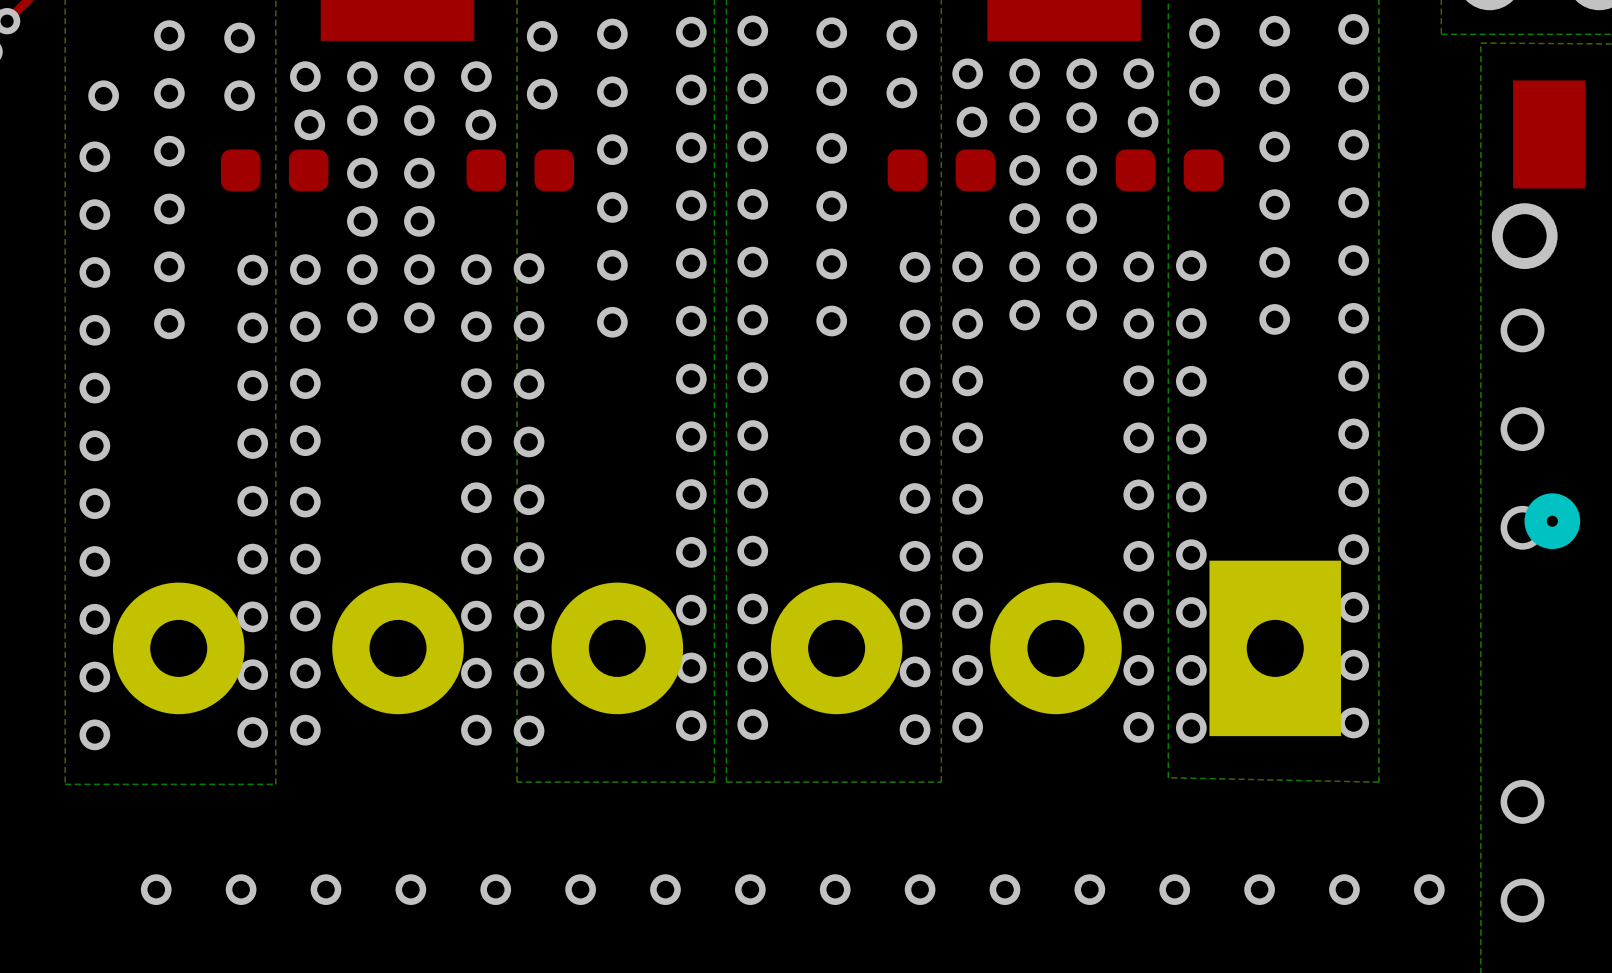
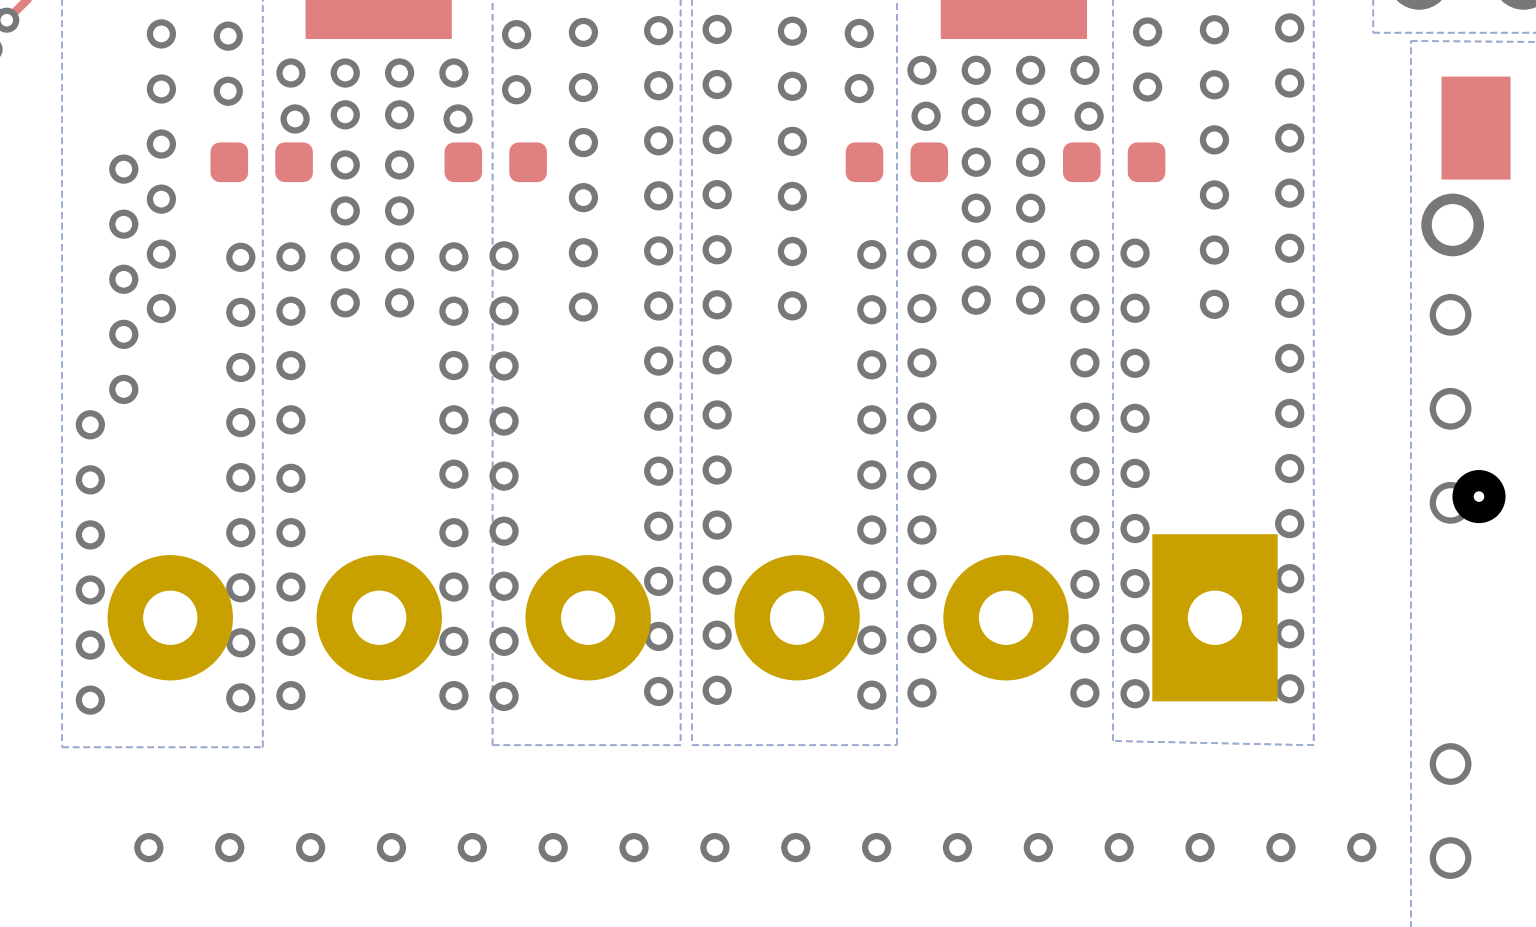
via: (103, 95) -> none
via: (94, 156) -> none
via: none -> (123, 169)
via: (94, 214) -> none
via: none -> (123, 224)
via: (94, 272) -> none
via: none -> (123, 279)
via: (94, 330) -> none
via: none -> (123, 334)
via: (94, 388) -> none
via: none -> (123, 389)

